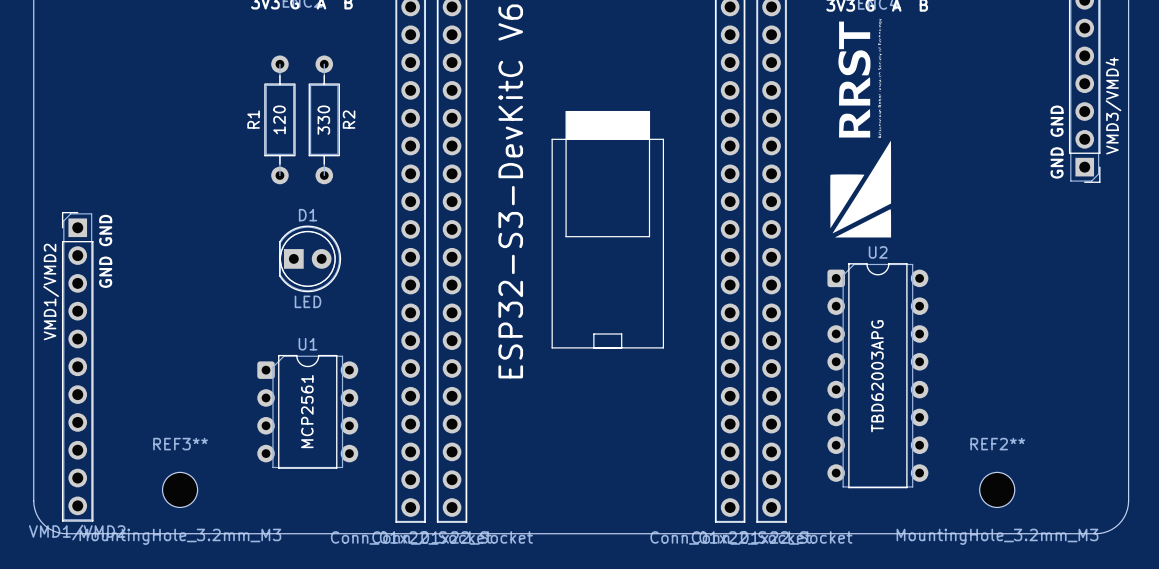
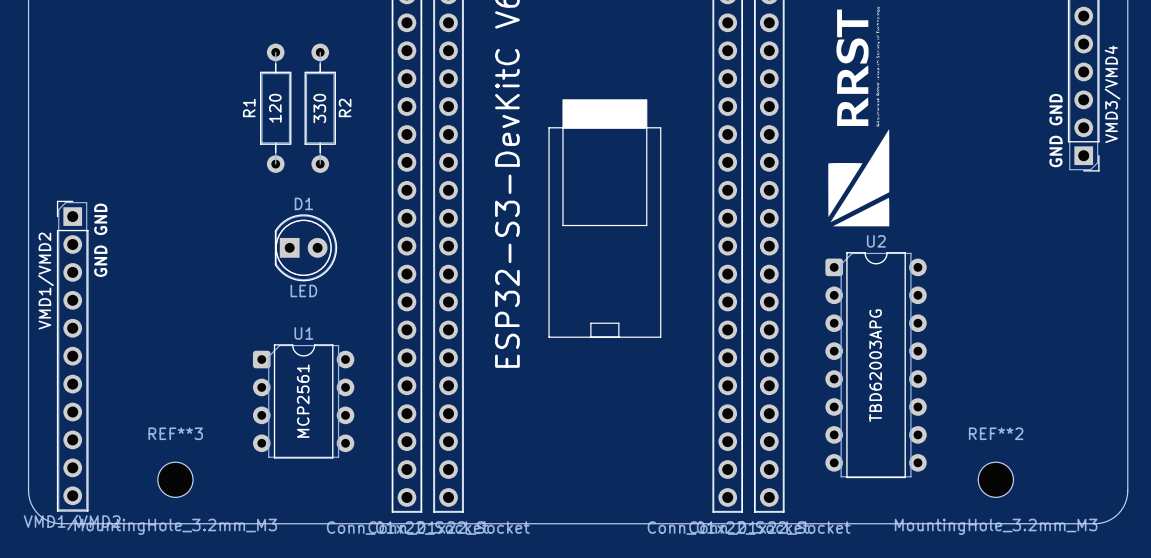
REF3** name: REF3** (180, 444) -> REF**3 (175, 433)
REF2** name: REF2** (997, 444) -> REF**2 (996, 433)

